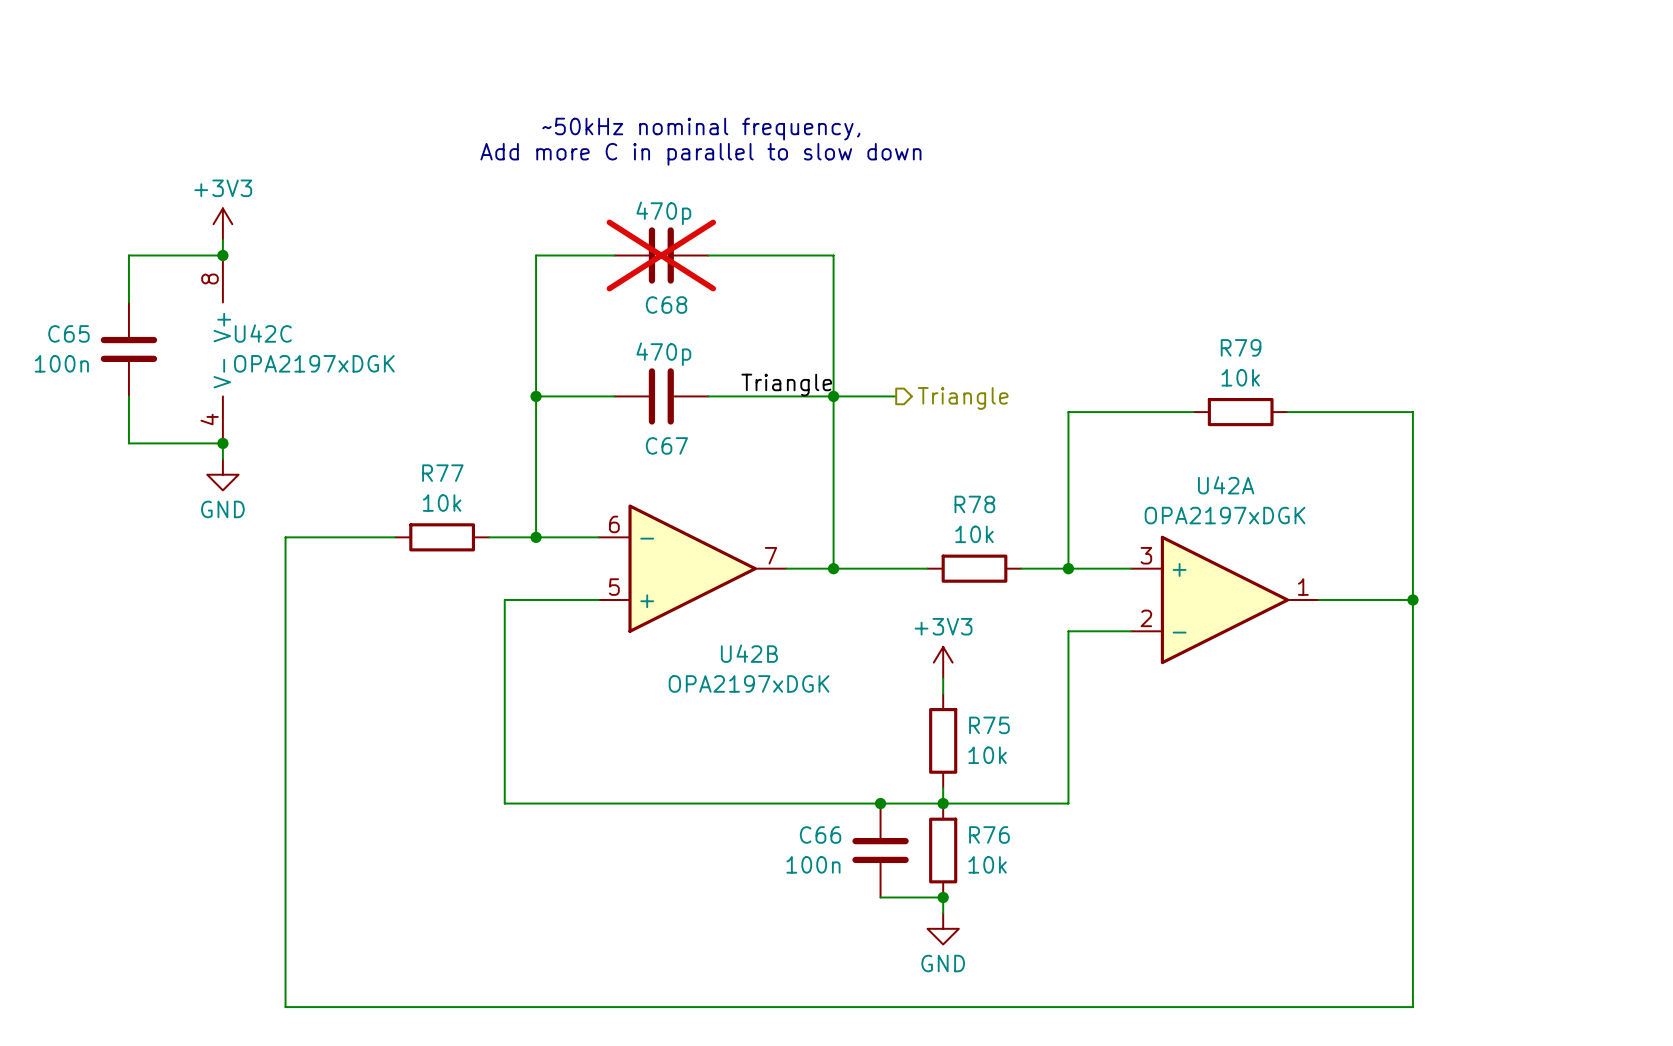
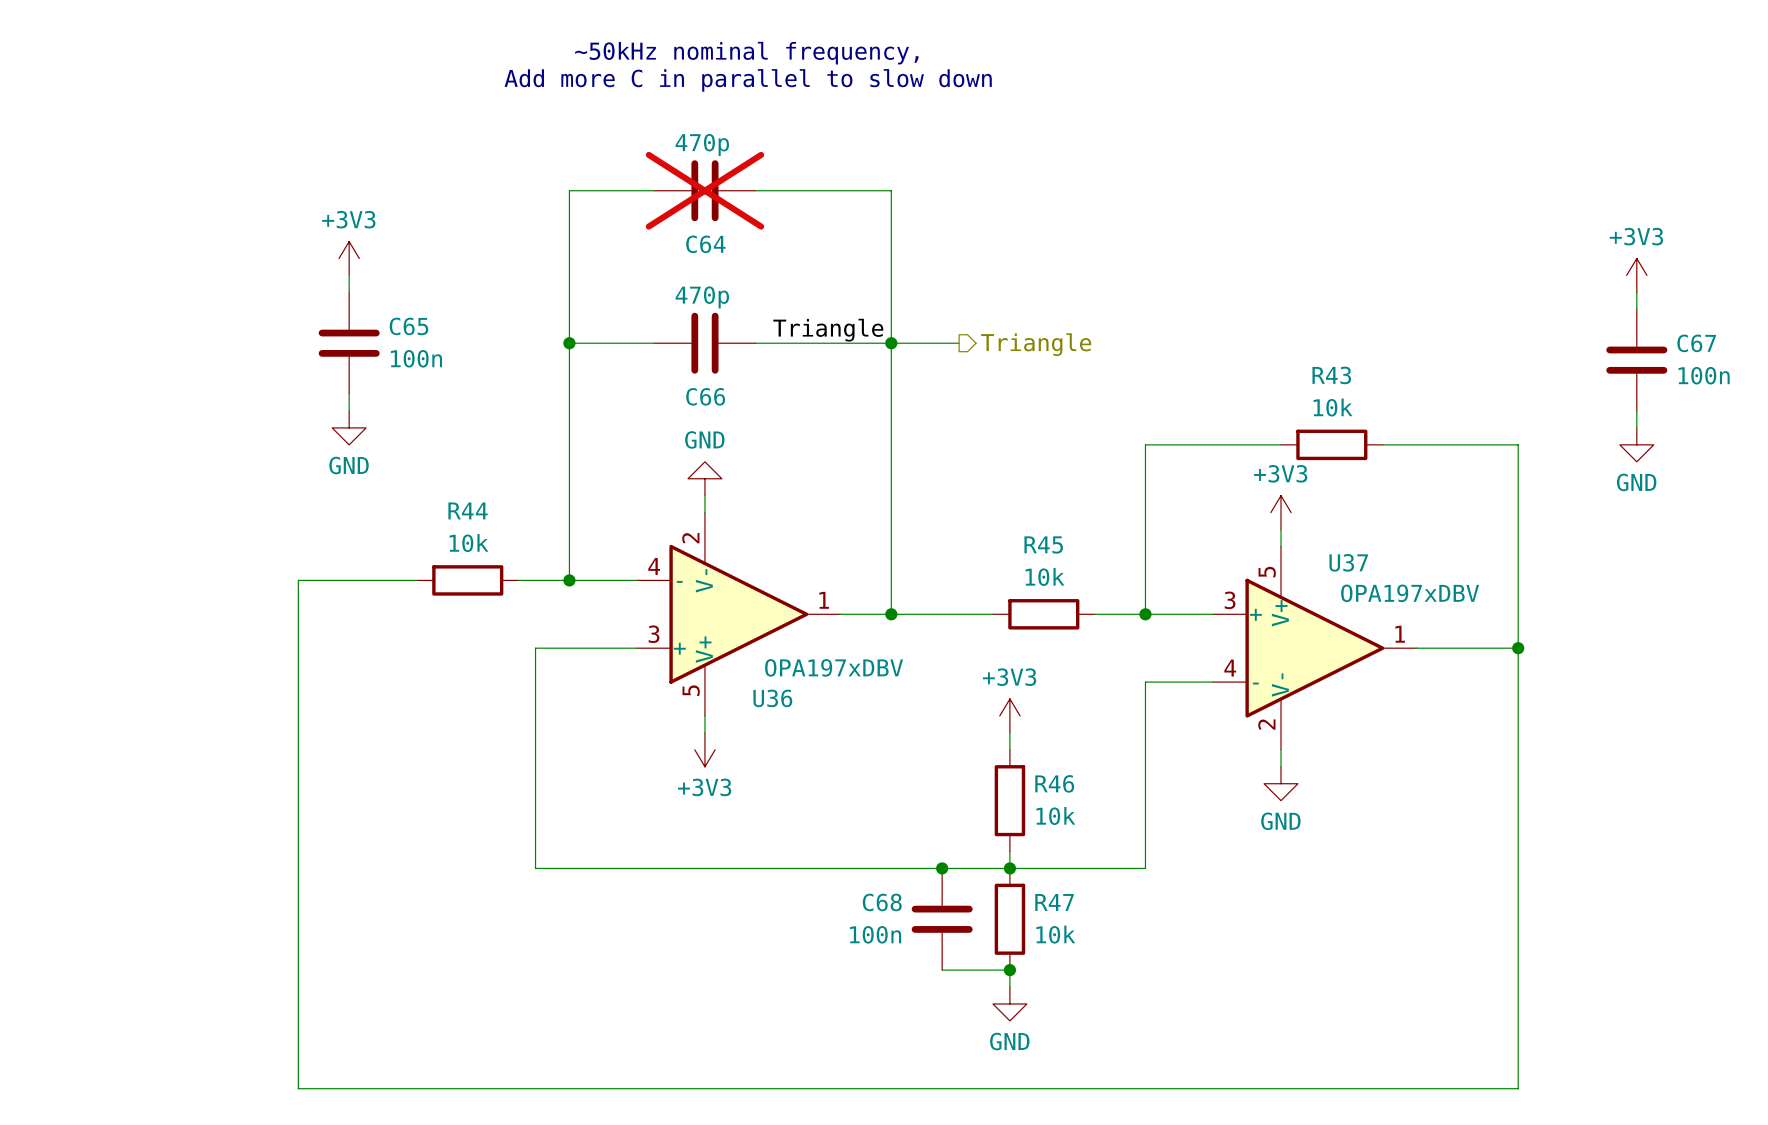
text position: ~50kHz nominal frequency, (701, 129) -> ~50kHz nominal frequency, (746, 53)
text position: Add more C in parallel to slow down (700, 154) -> Add more C in parallel to slow down (748, 80)
C64: none -> 470p (704, 190)
power symbol position: +3V3 (222, 224) -> +3V3 (349, 258)
wire: (222, 239) (222, 255) (128, 255) (128, 302) -> none
junction: (222, 255) -> none
wire: none -> (349, 275) (349, 292)
wire: (536, 255) (614, 255) -> (569, 275) (569, 190) (654, 190)
C68: 470p (661, 255) -> none
wire: (708, 255) (833, 255) -> (755, 190) (891, 190) (891, 275)
power symbol: none -> +3V3 (1636, 275)
wire: none -> (1636, 292) (1636, 309)
junction: none -> (569, 343)
C66: none -> 470p (704, 343)
junction: none -> (891, 343)
C65 name position: C65 (68, 333) -> C65 (408, 326)
R79 name: R79 (1241, 347) -> R43 (1331, 375)
C65 position: (128, 349) -> (349, 343)
U42C: OPA2197xDGK (222, 349) -> none
C67 value: 470p (663, 354) -> 100n (1704, 375)
C65 value position: 100n (61, 363) -> 100n (416, 358)
wire: none -> (349, 394) (349, 410)
wire: none -> (1636, 410) (1636, 427)
label position: Triangle (786, 385) -> Triangle (828, 330)
wire: (128, 396) (128, 443) (222, 443) (222, 459) -> none
wire: (536, 396) (614, 396) -> (569, 343) (654, 343)
junction: (536, 396) -> none
C67 rotation: 0° (661, 396) -> 90° clockwise (1636, 360)
C67 position: (661, 396) -> (1636, 360)
wire: (708, 396) (896, 396) -> (755, 343) (959, 343)
junction: (833, 396) -> none
hierarchical label position: Triangle (963, 398) -> Triangle (1036, 344)
power symbol: none -> GND (1636, 444)
junction: (222, 443) -> none
power symbol: none -> GND (704, 478)
C67 name position: C67 (666, 445) -> C67 (1696, 343)
wire: none -> (704, 495) (704, 512)
R77 name: R77 (442, 473) -> R44 (468, 510)
power symbol position: GND (222, 474) -> GND (349, 427)
power symbol: none -> +3V3 (1281, 512)
wire: none -> (1281, 529) (1281, 546)
R78 name: R78 (974, 504) -> R45 (1043, 544)
U42B: OPA2197xDGK (692, 568) -> none
U36: none -> OPA197xDBV (738, 614)
U42A: OPA2197xDGK (1225, 599) -> none
U37: none -> OPA197xDBV (1314, 648)
wire: none -> (704, 715) (704, 732)
power symbol: none -> +3V3 (704, 749)
wire: none -> (1281, 749) (1281, 766)
R75 name: R75 (989, 725) -> R46 (1054, 783)
power symbol: none -> GND (1281, 783)
C66 name: C66 (820, 834) -> C68 (882, 902)
R76 name: R76 (989, 834) -> R47 (1054, 902)

